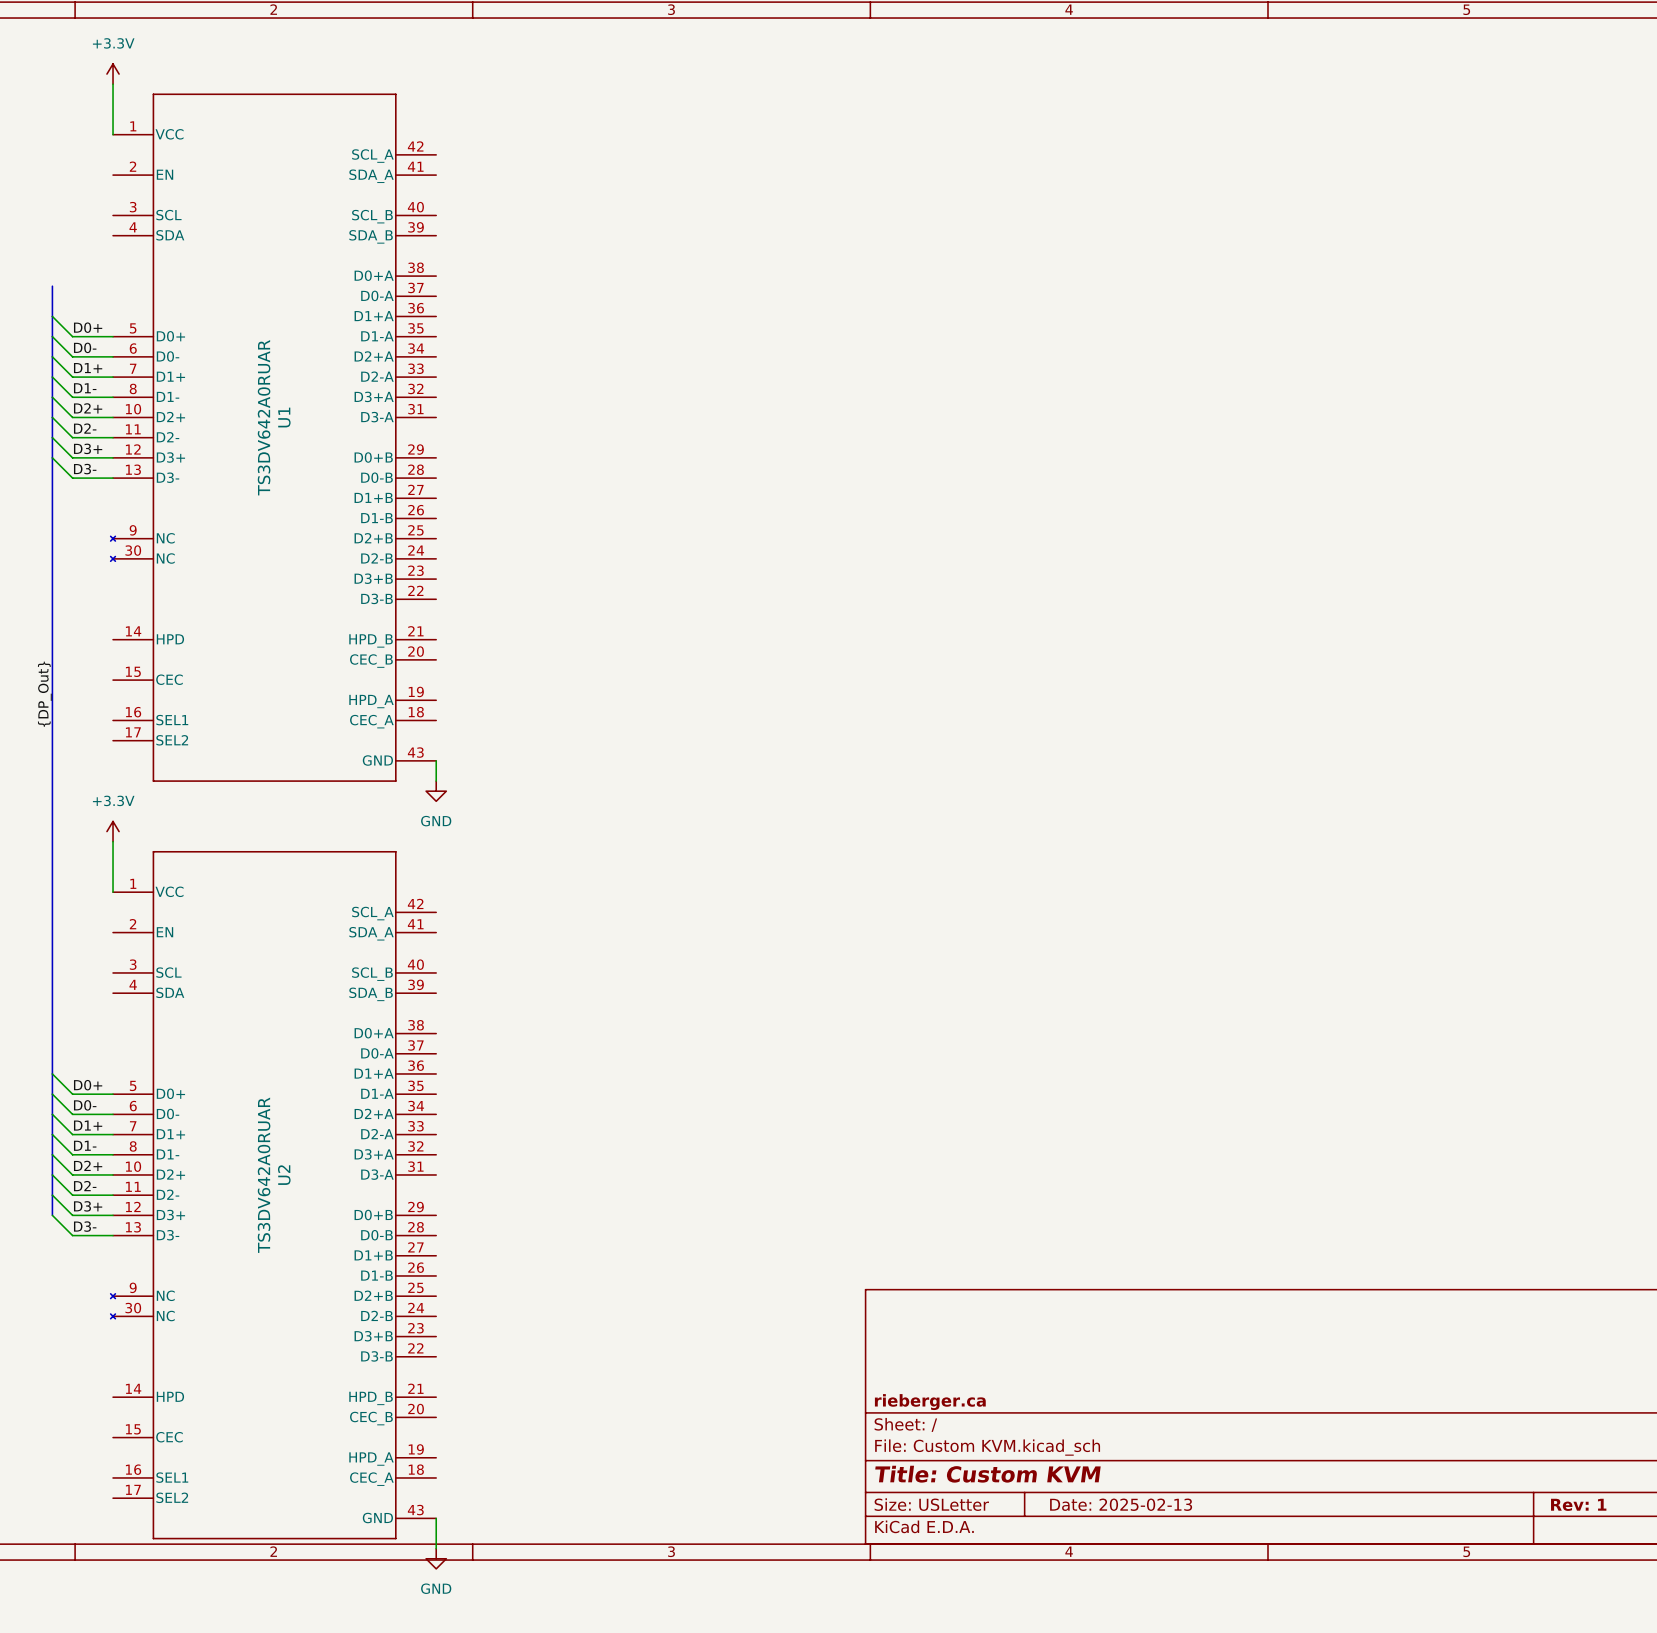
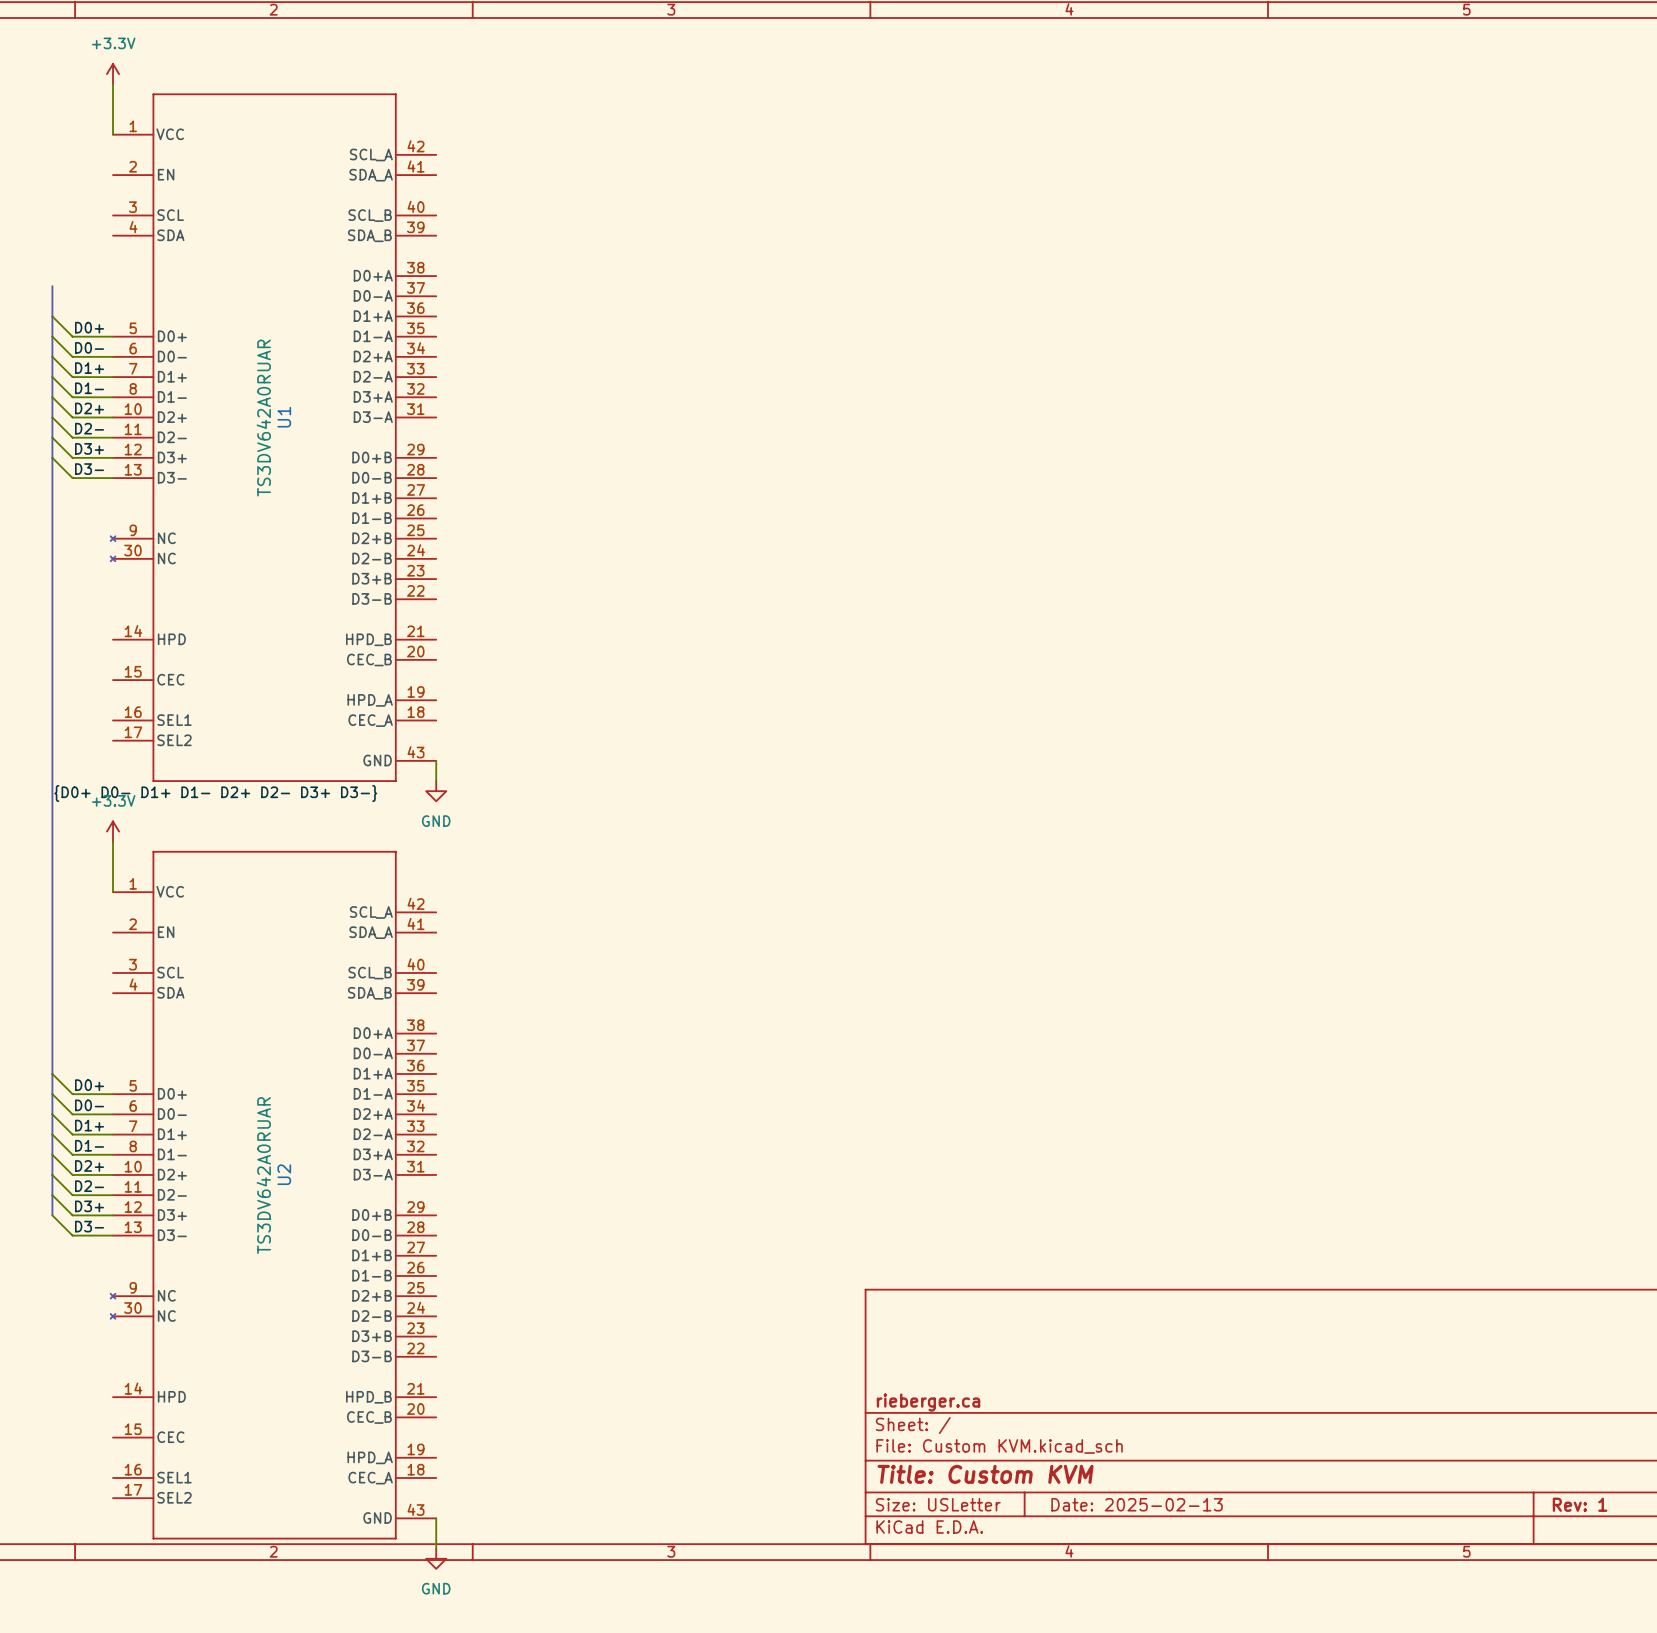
label: {DP_Out} (44, 694) -> none
label: none -> {D0+ D0- D1+ D1- D2+ D2- D3+ D3-} (215, 793)

